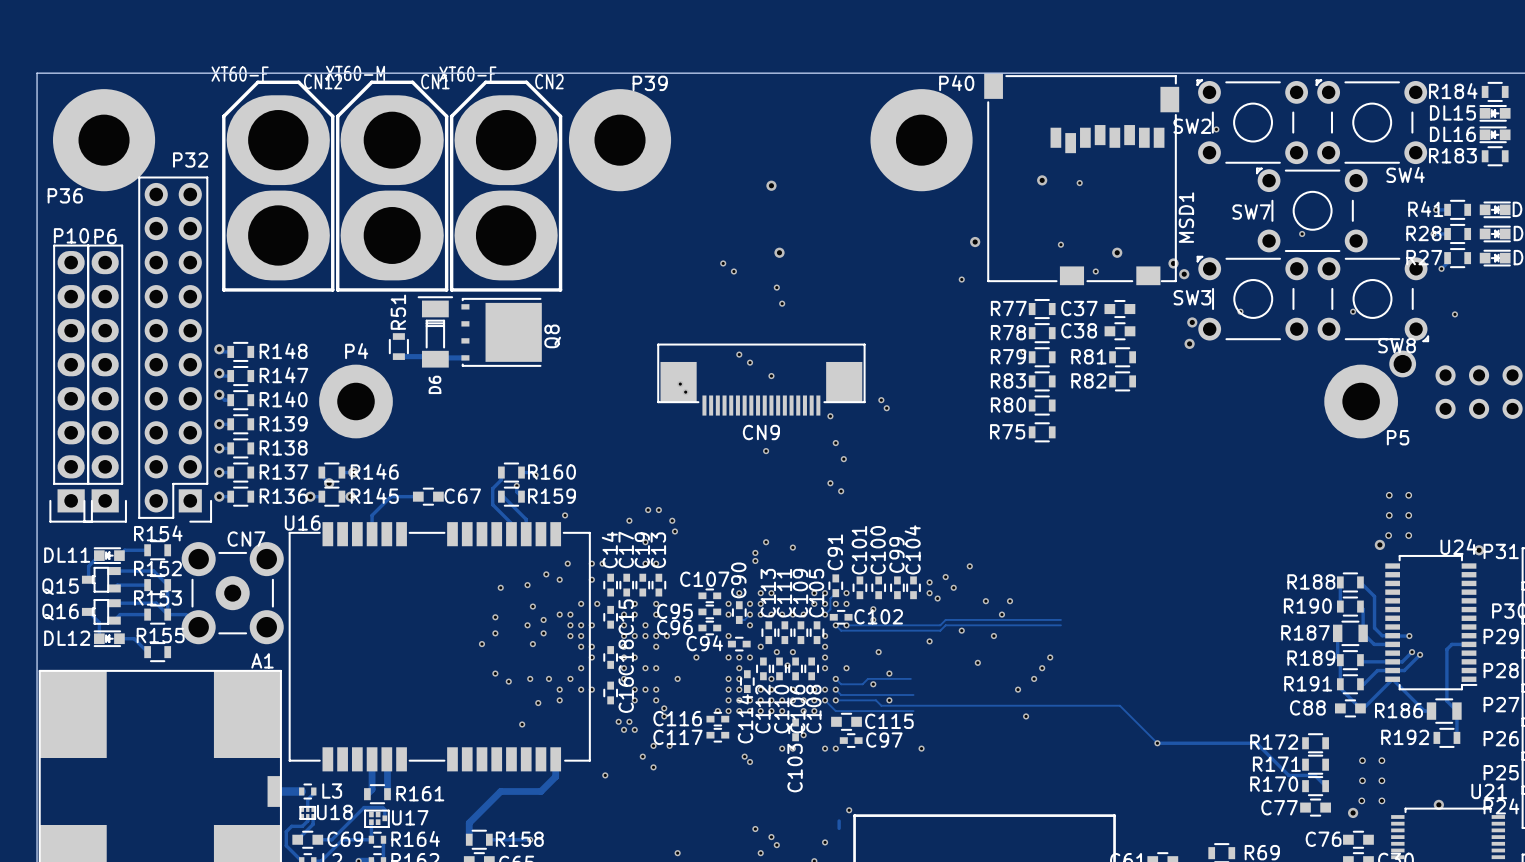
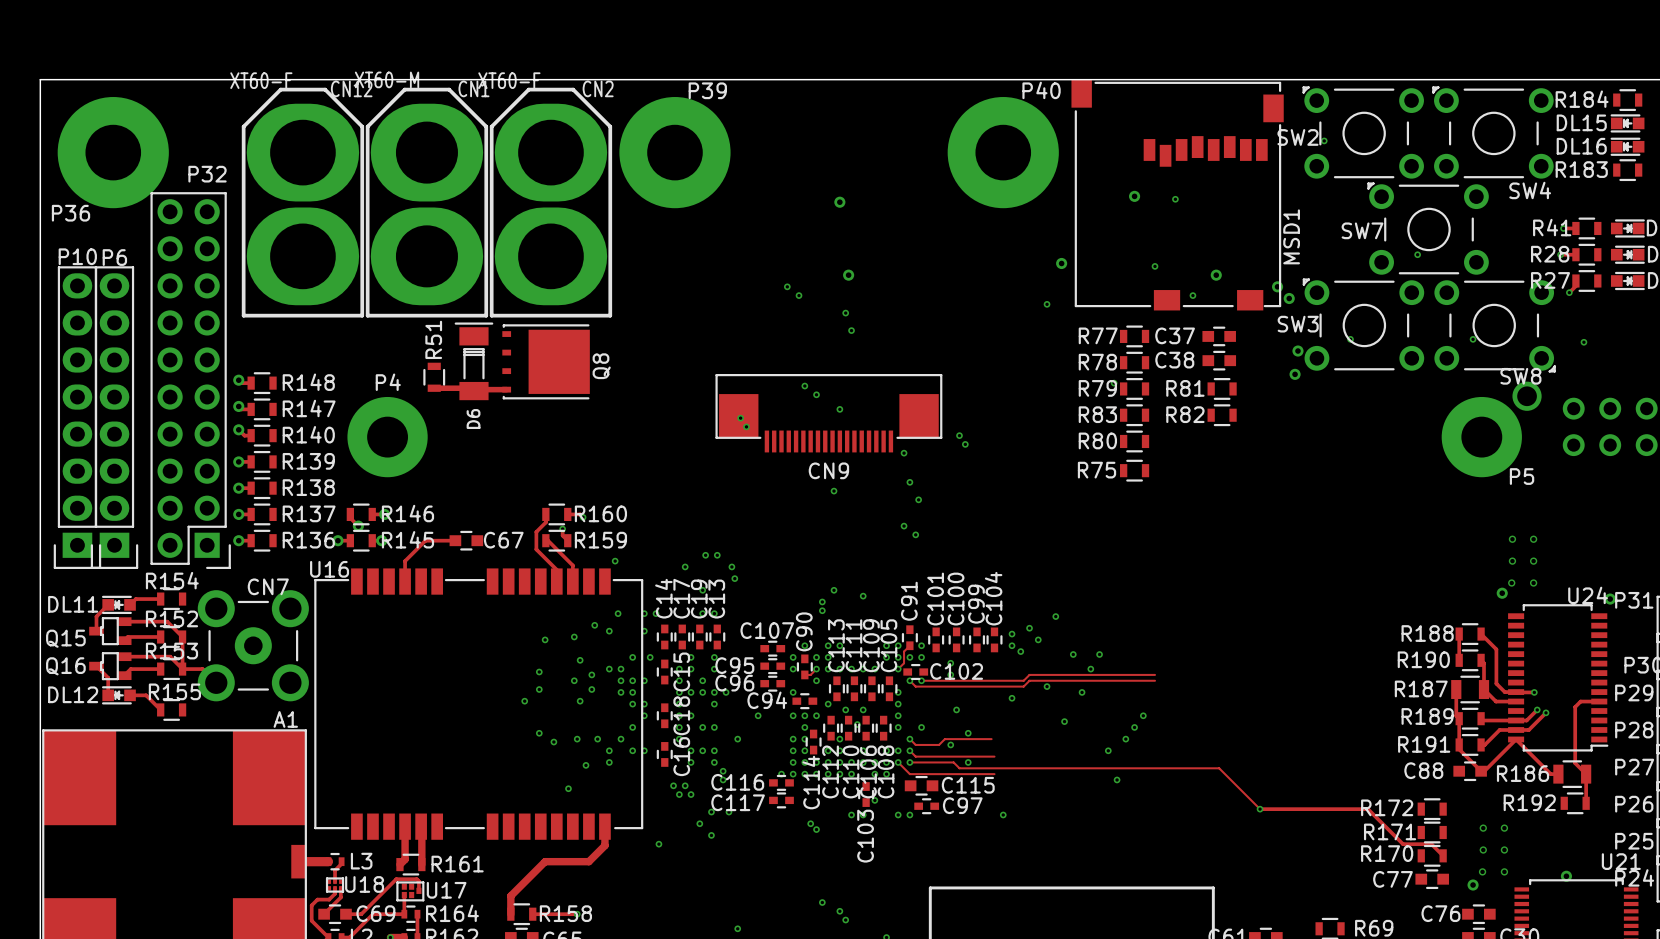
via: (849, 810) -> none
track: (839, 820) (839, 828) -> none
via: (825, 842) -> none
via: (760, 853) -> none

